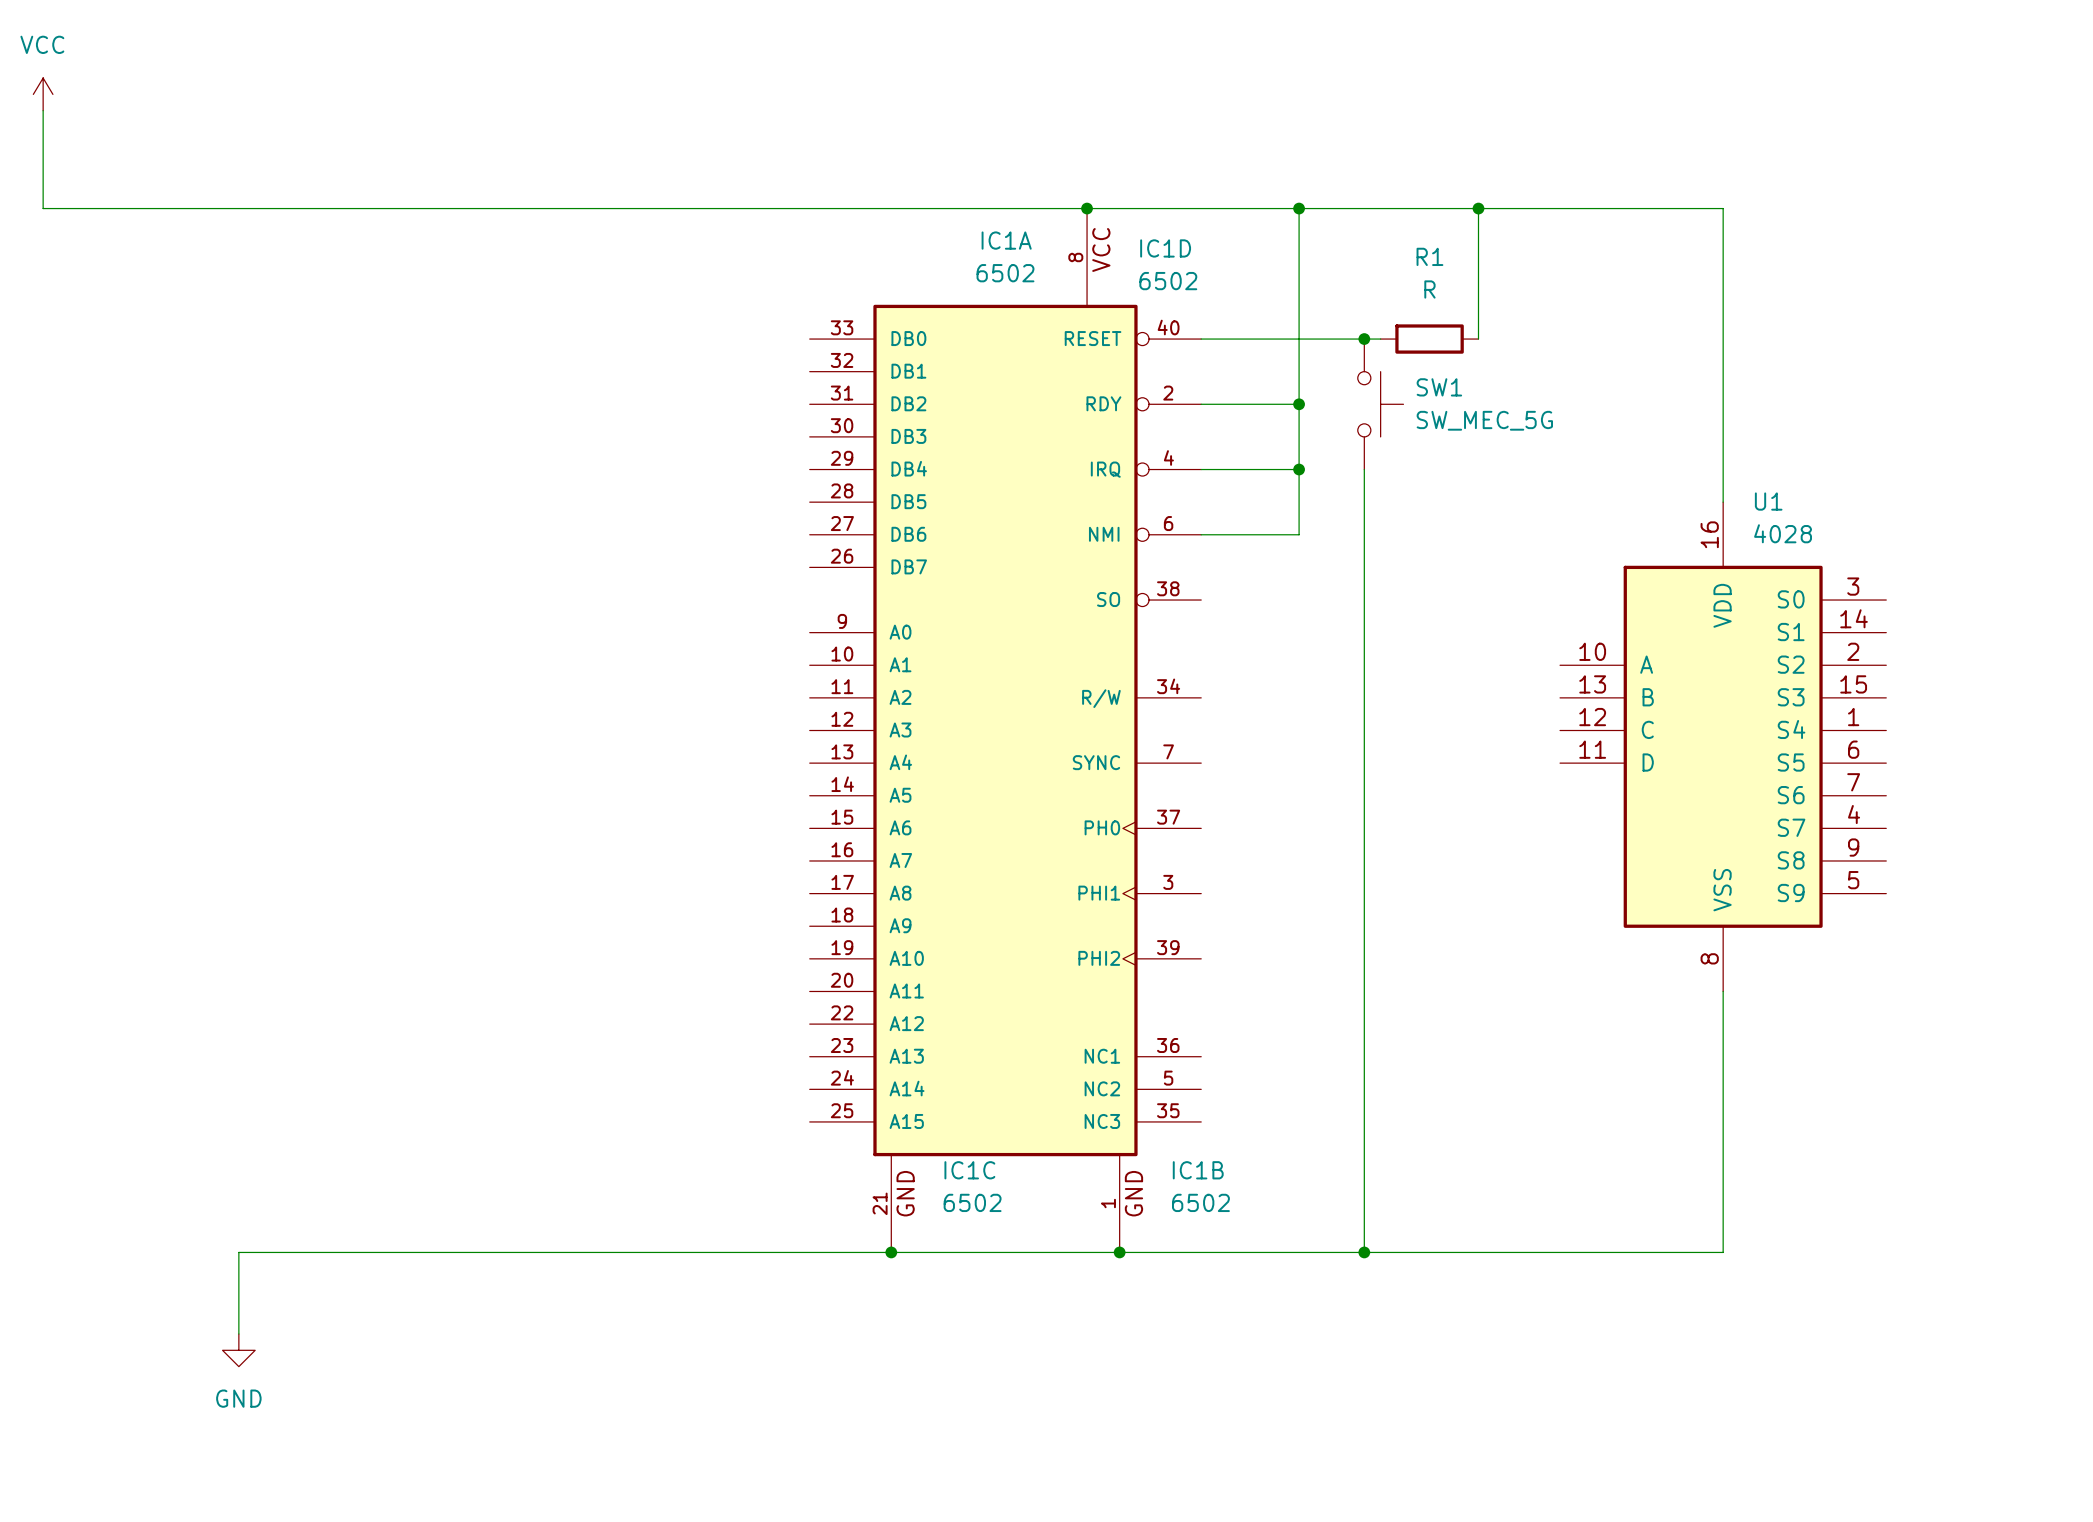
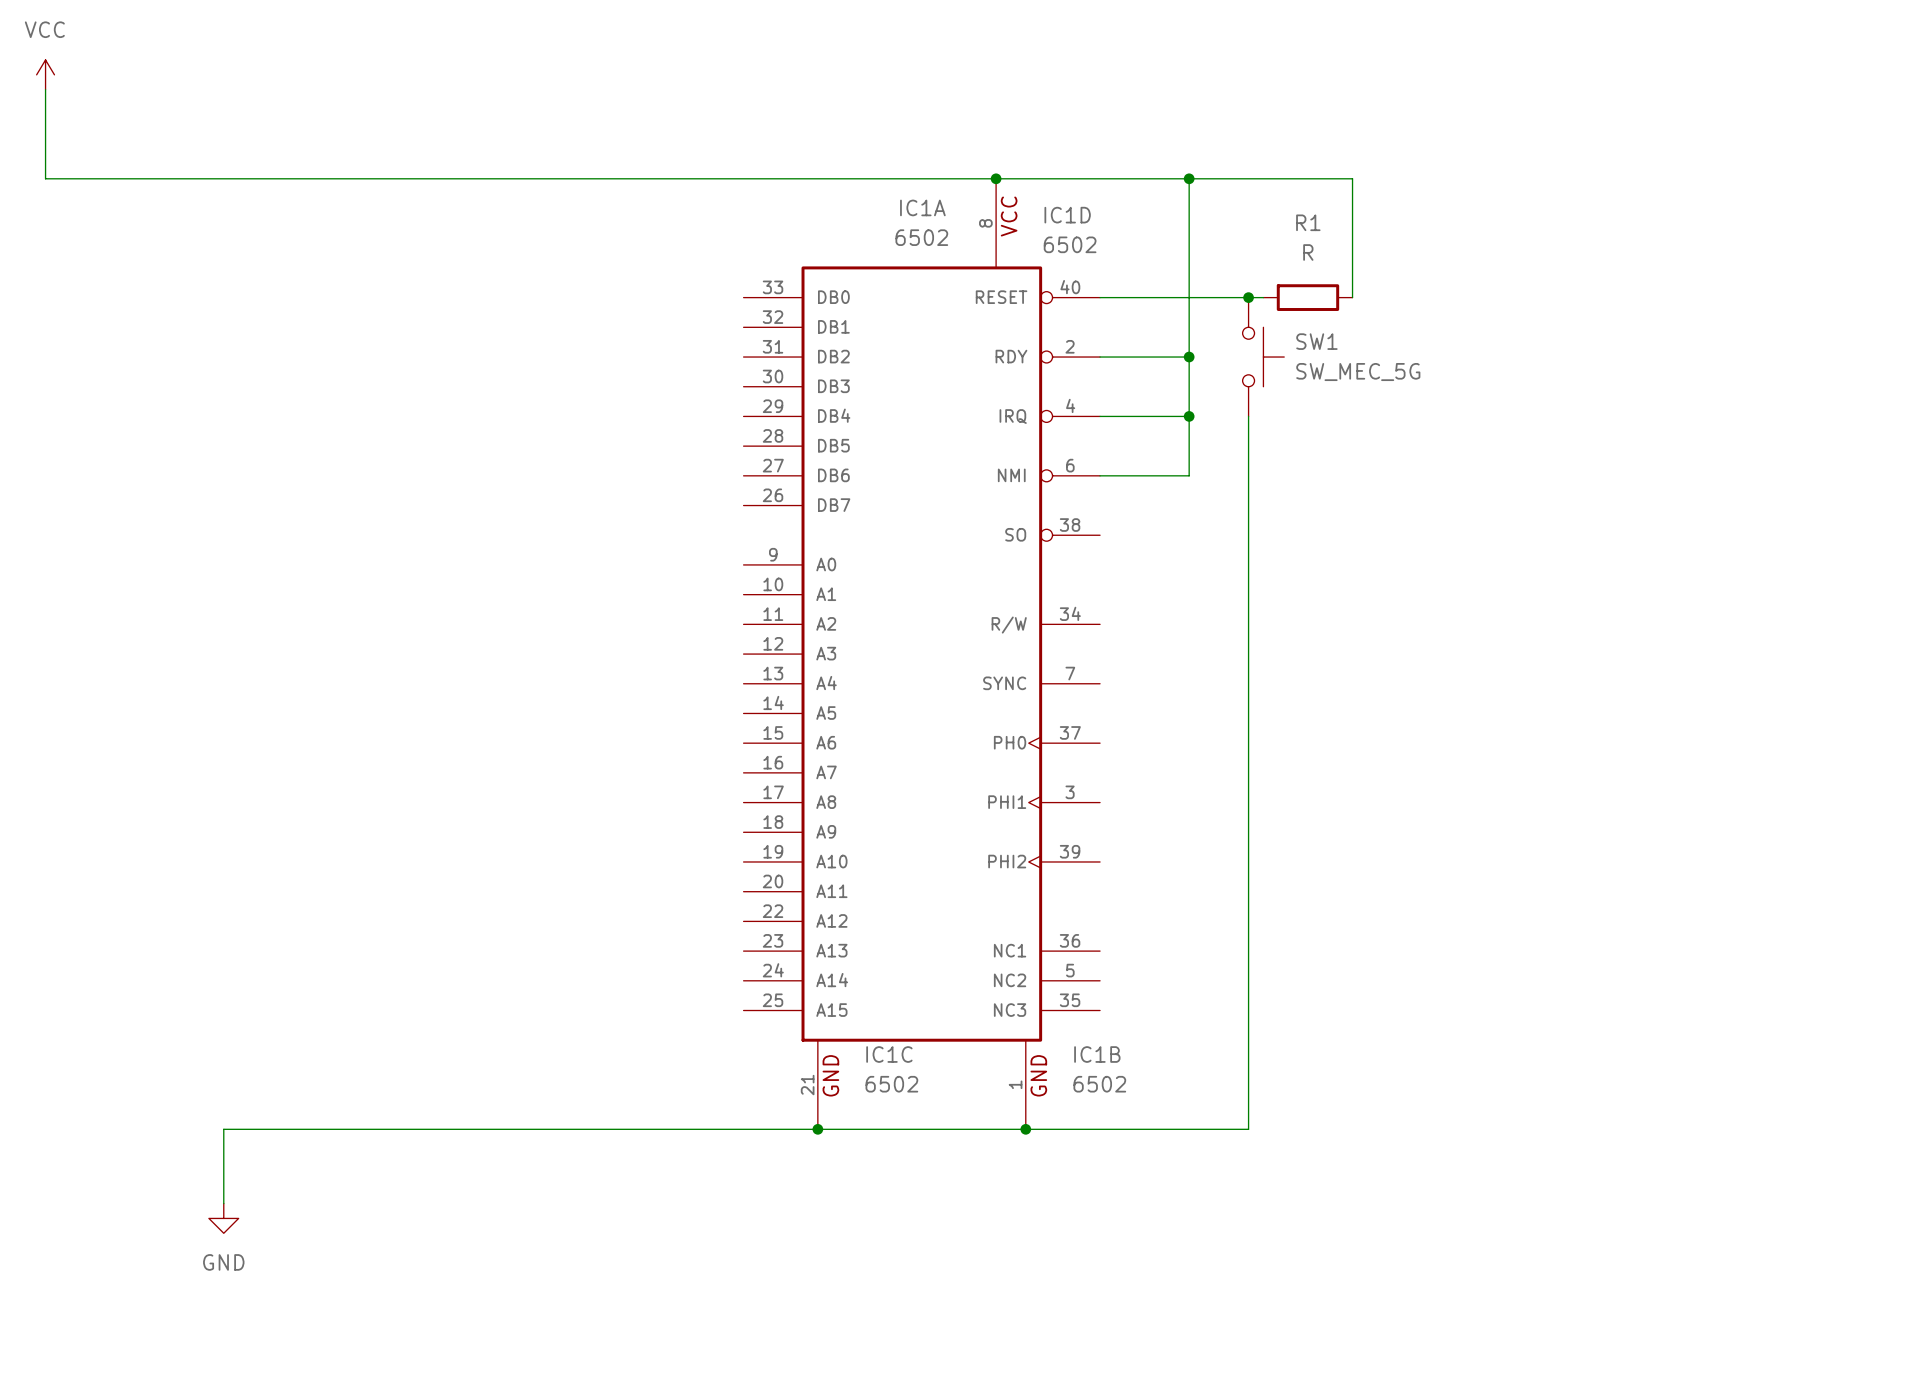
wire: (1478, 208) (1723, 208) (1723, 502) -> none
junction: (1478, 208) -> none
U1: 4028 (1723, 746) -> none
wire: (1723, 991) (1723, 1252) (1364, 1252) -> none
junction: (1364, 1252) -> none

